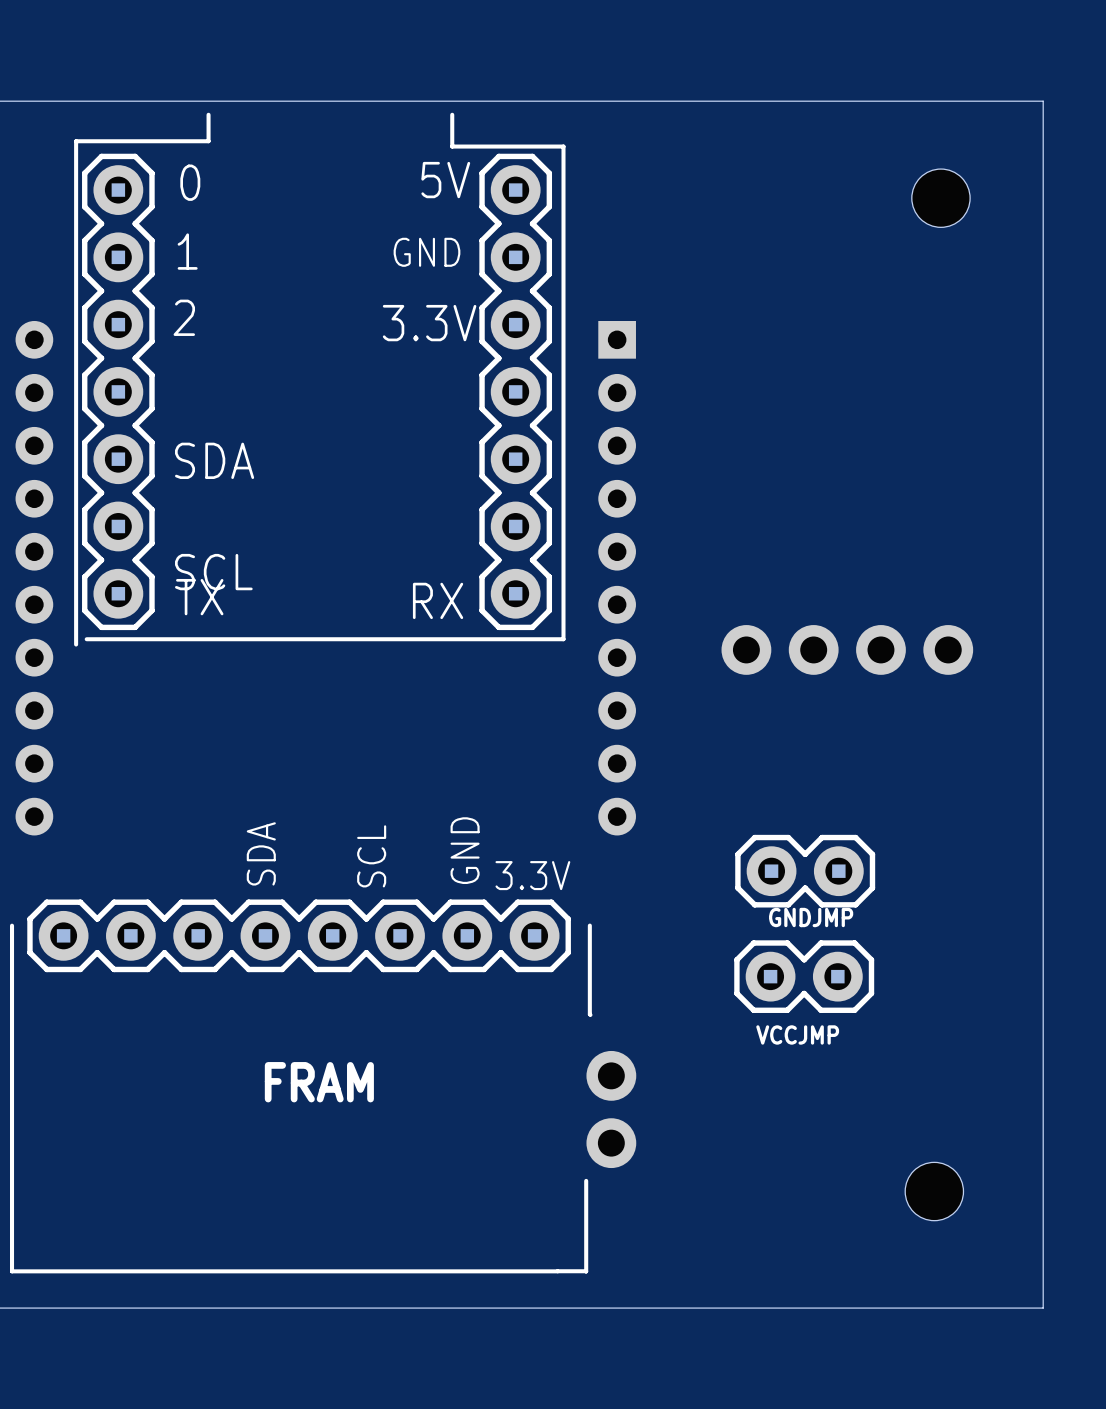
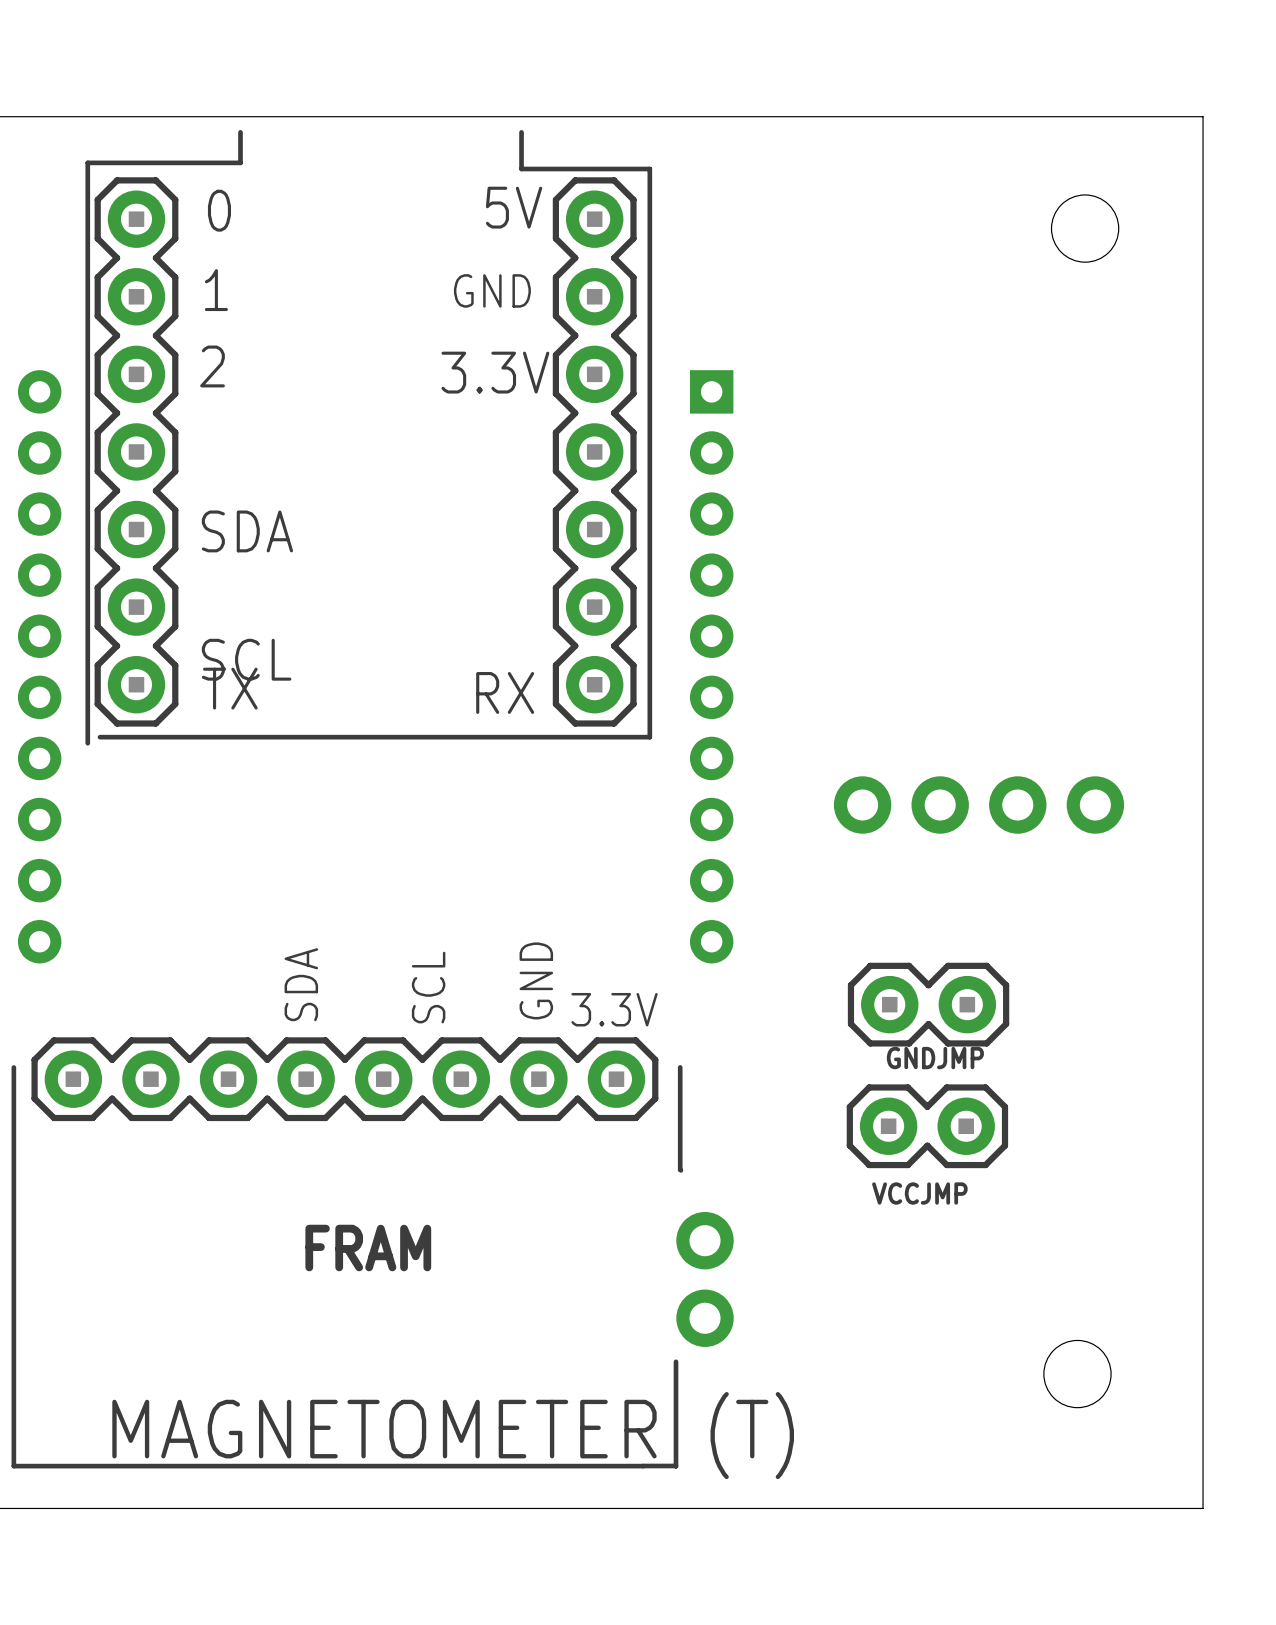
part position: (847, 649) -> (978, 805)
text: none -> MAGNETOMETER (T) (453, 1435)

